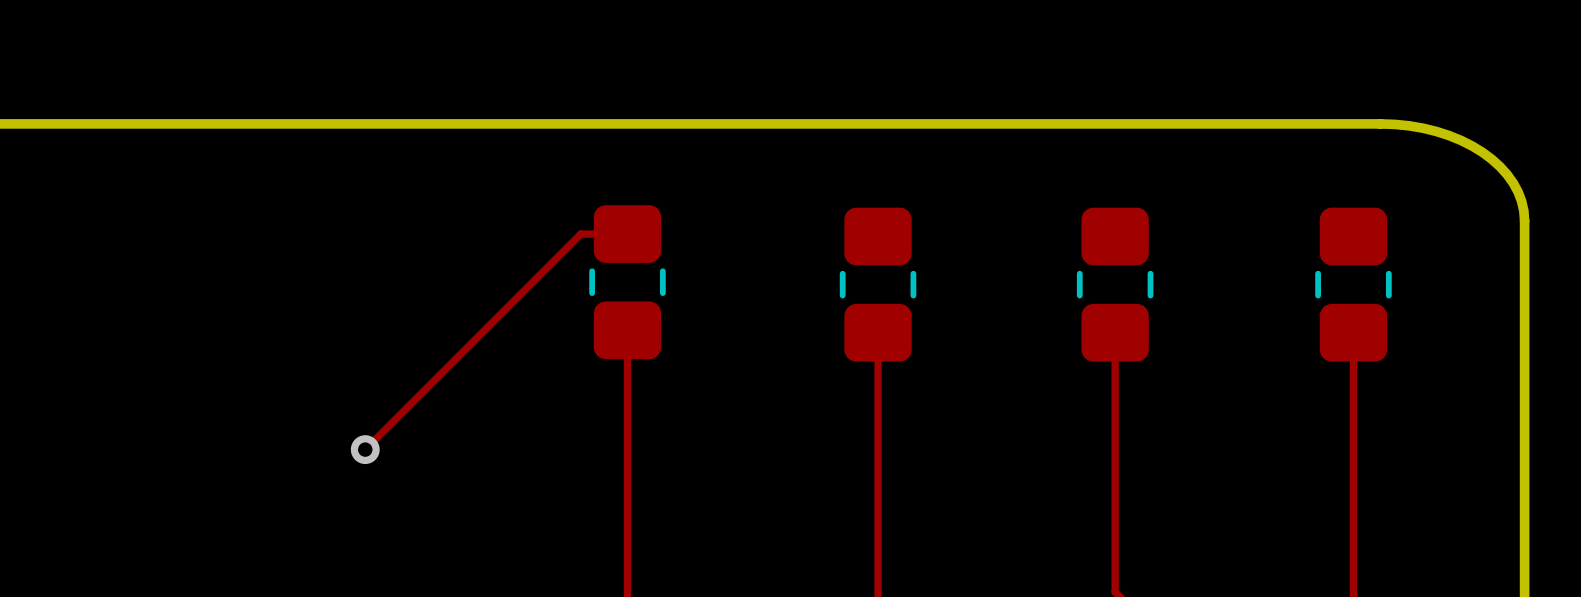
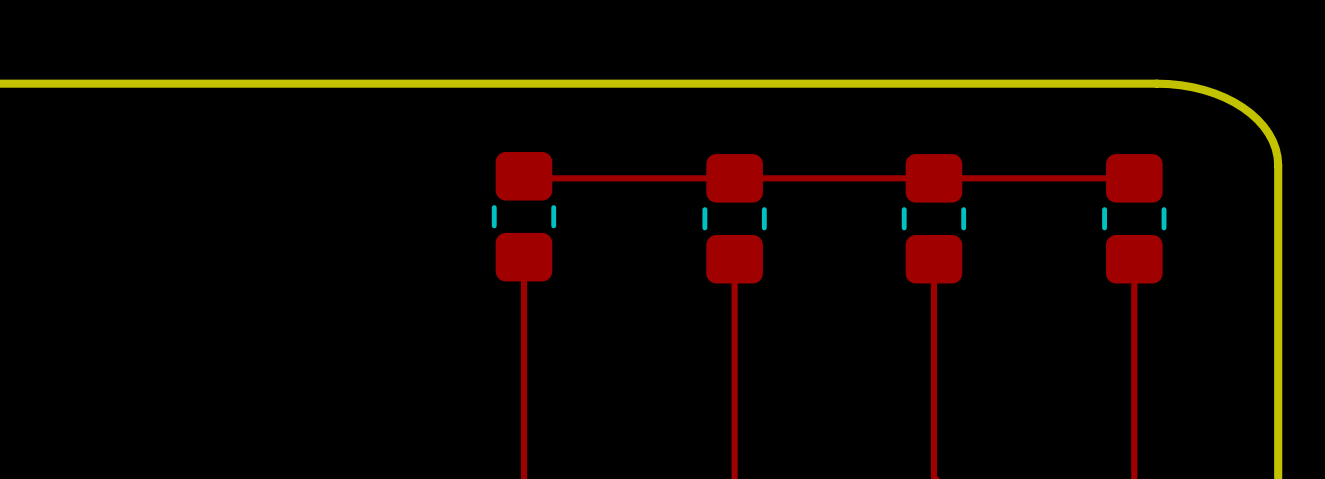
track: (627, 234) (580, 234) (365, 449) -> (523, 176) (526, 178) (1134, 178)
via: (365, 449) -> none

